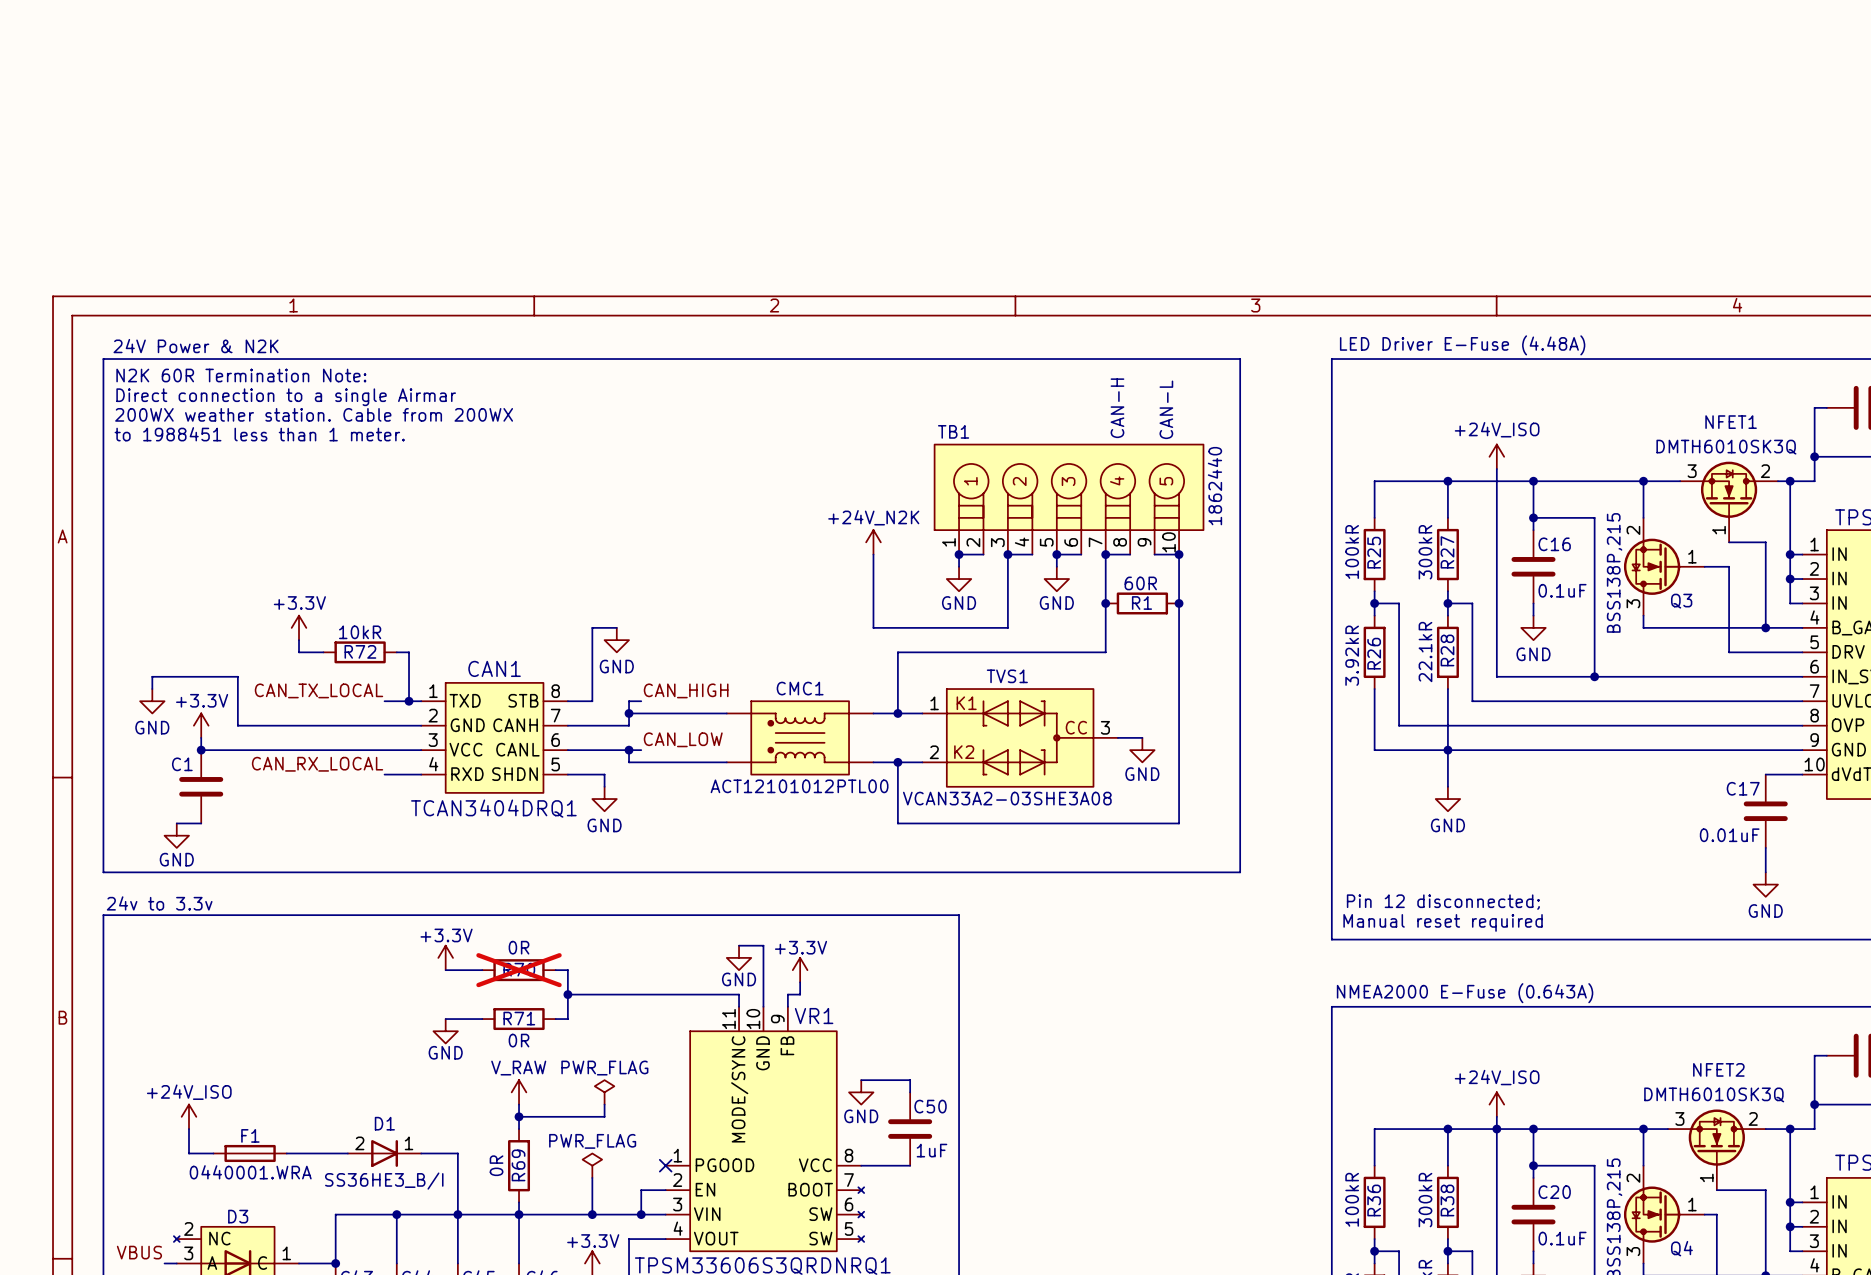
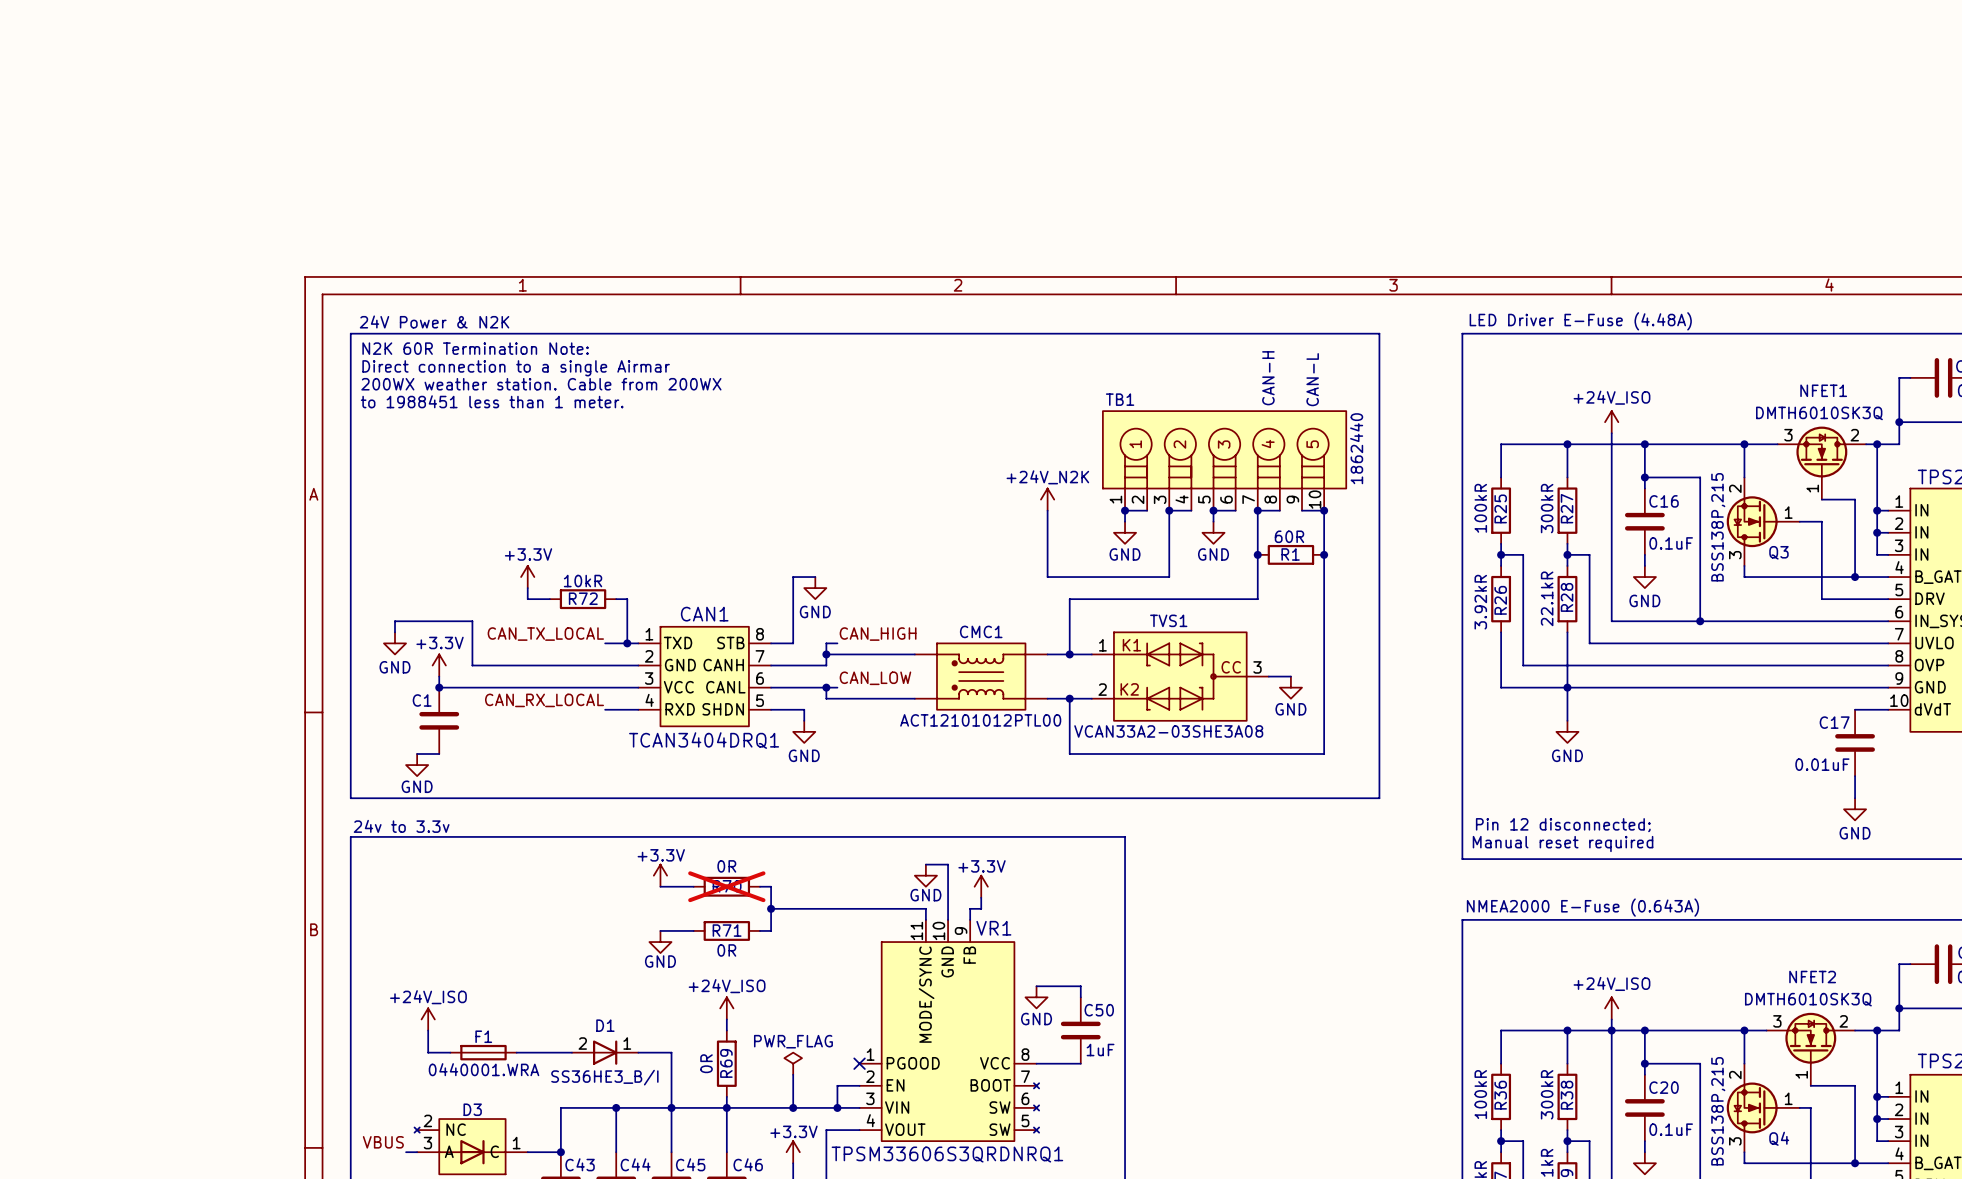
power symbol: V_RAW (519, 1092) -> none
power symbol: PWR_FLAG (604, 1092) -> none
wire: (519, 1104) (519, 1116) (604, 1116) (604, 1104) -> none
power symbol: none -> +24V_ISO (726, 1008)
junction: (519, 1116) -> none

